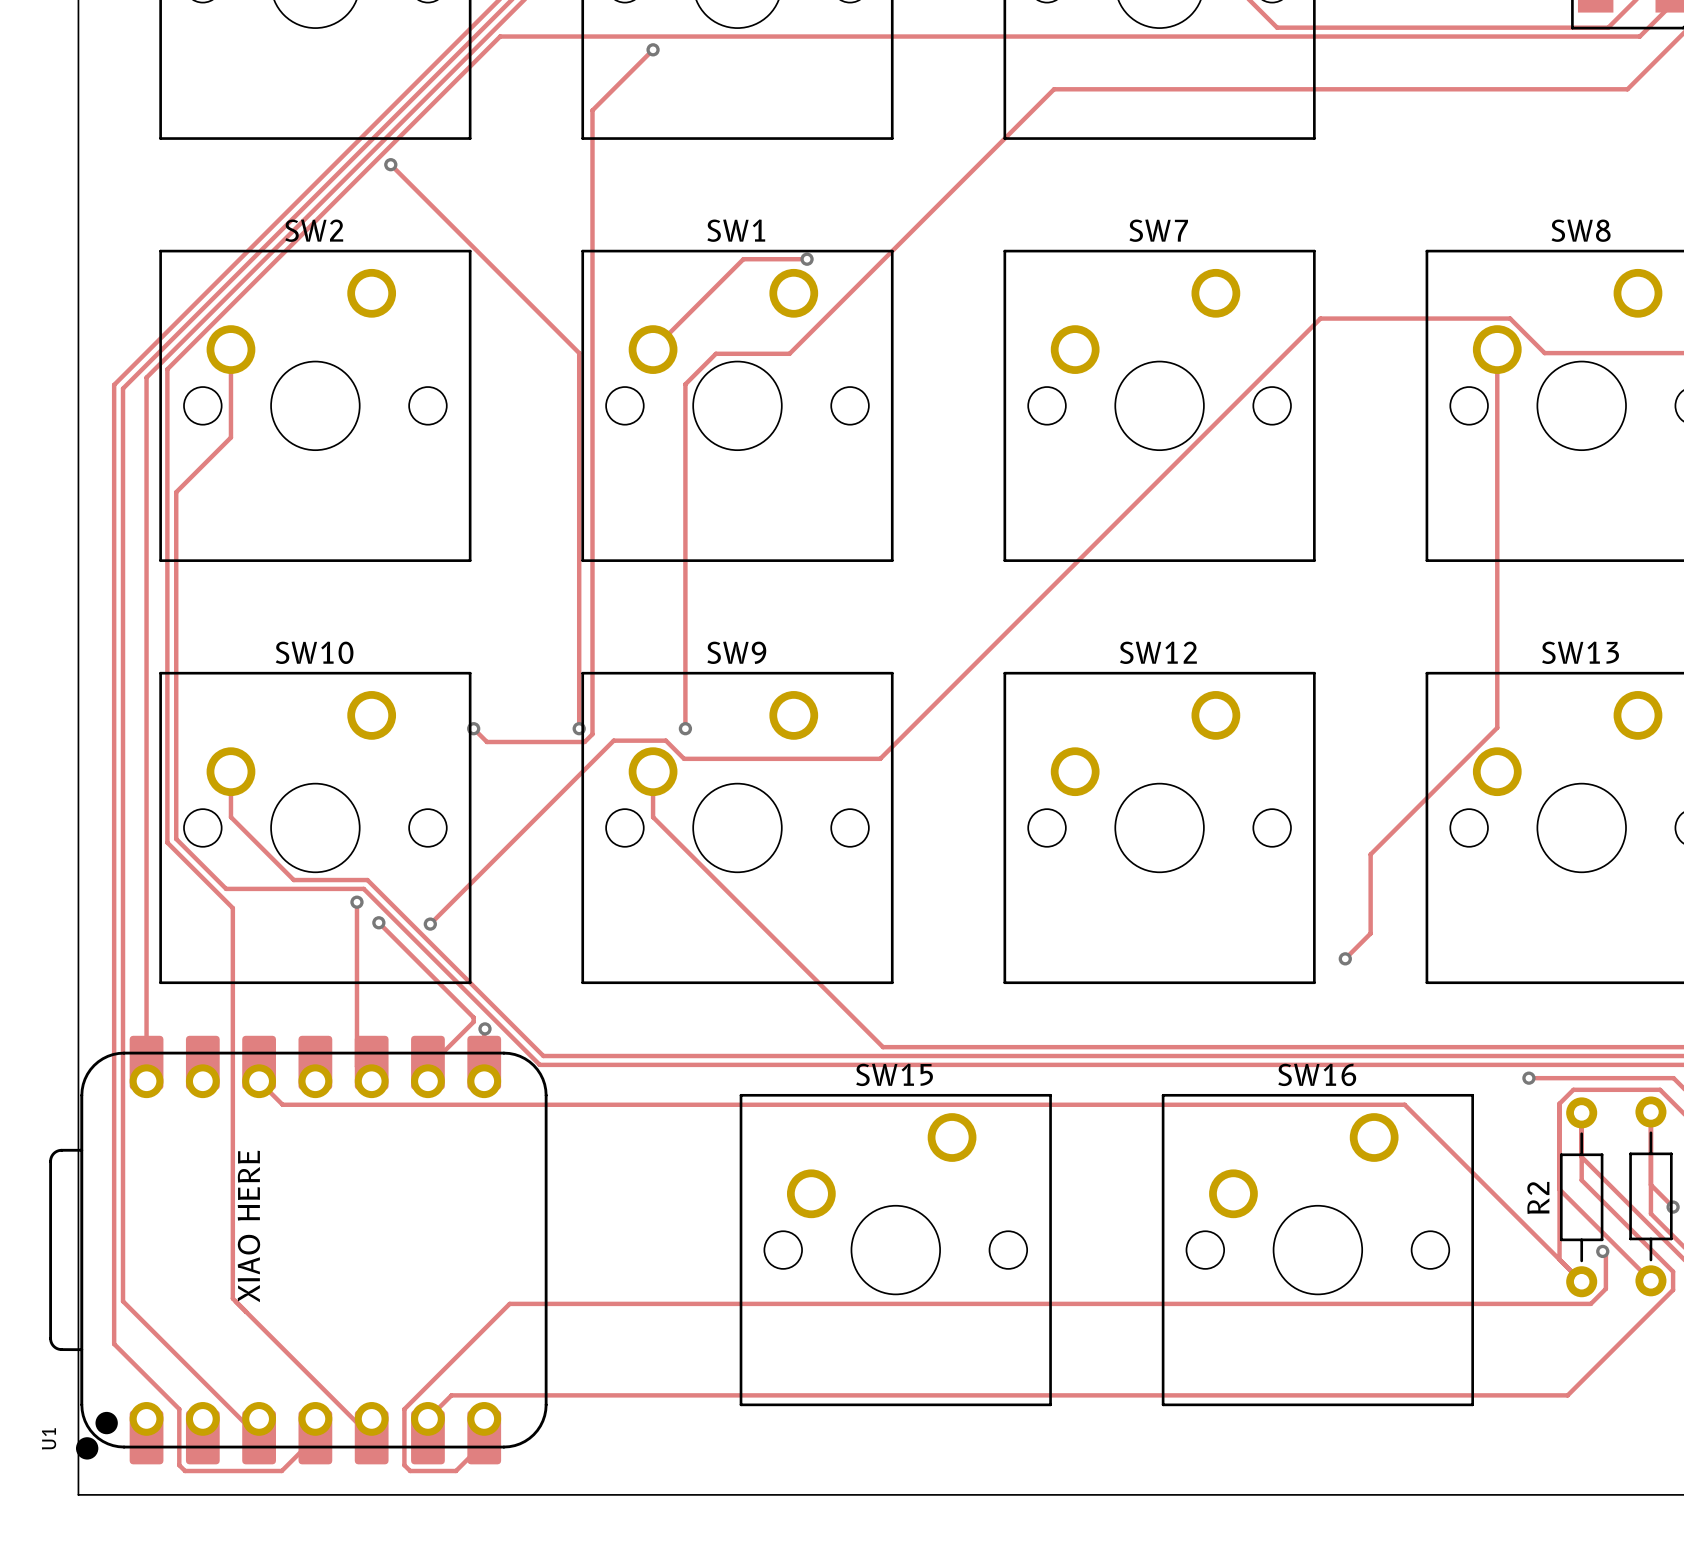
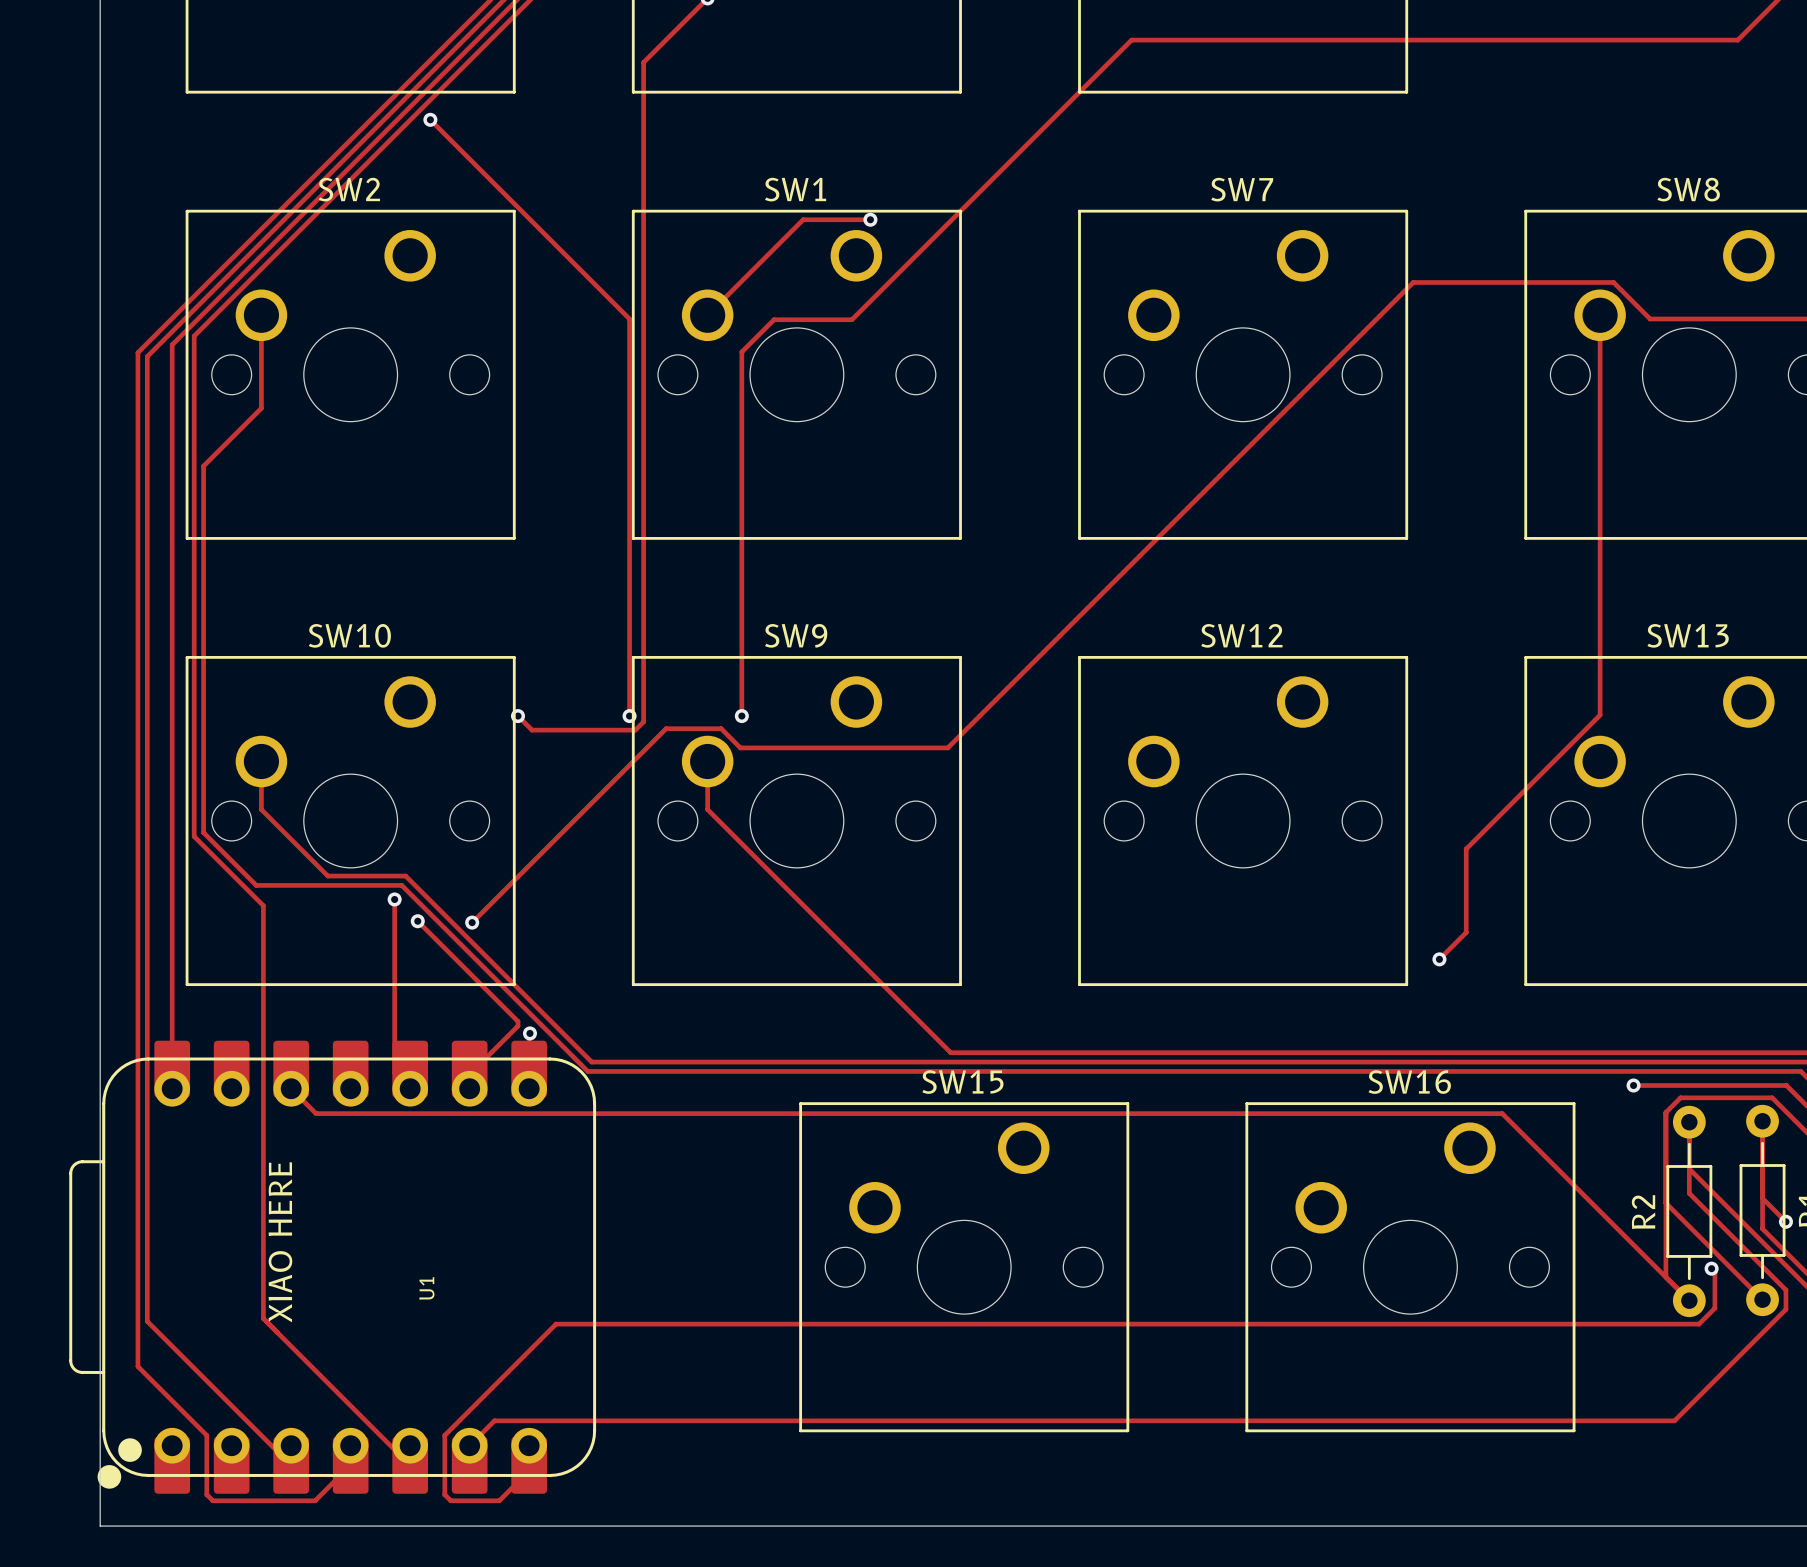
U1 name position: U1 (49, 1438) -> U1 (426, 1288)

